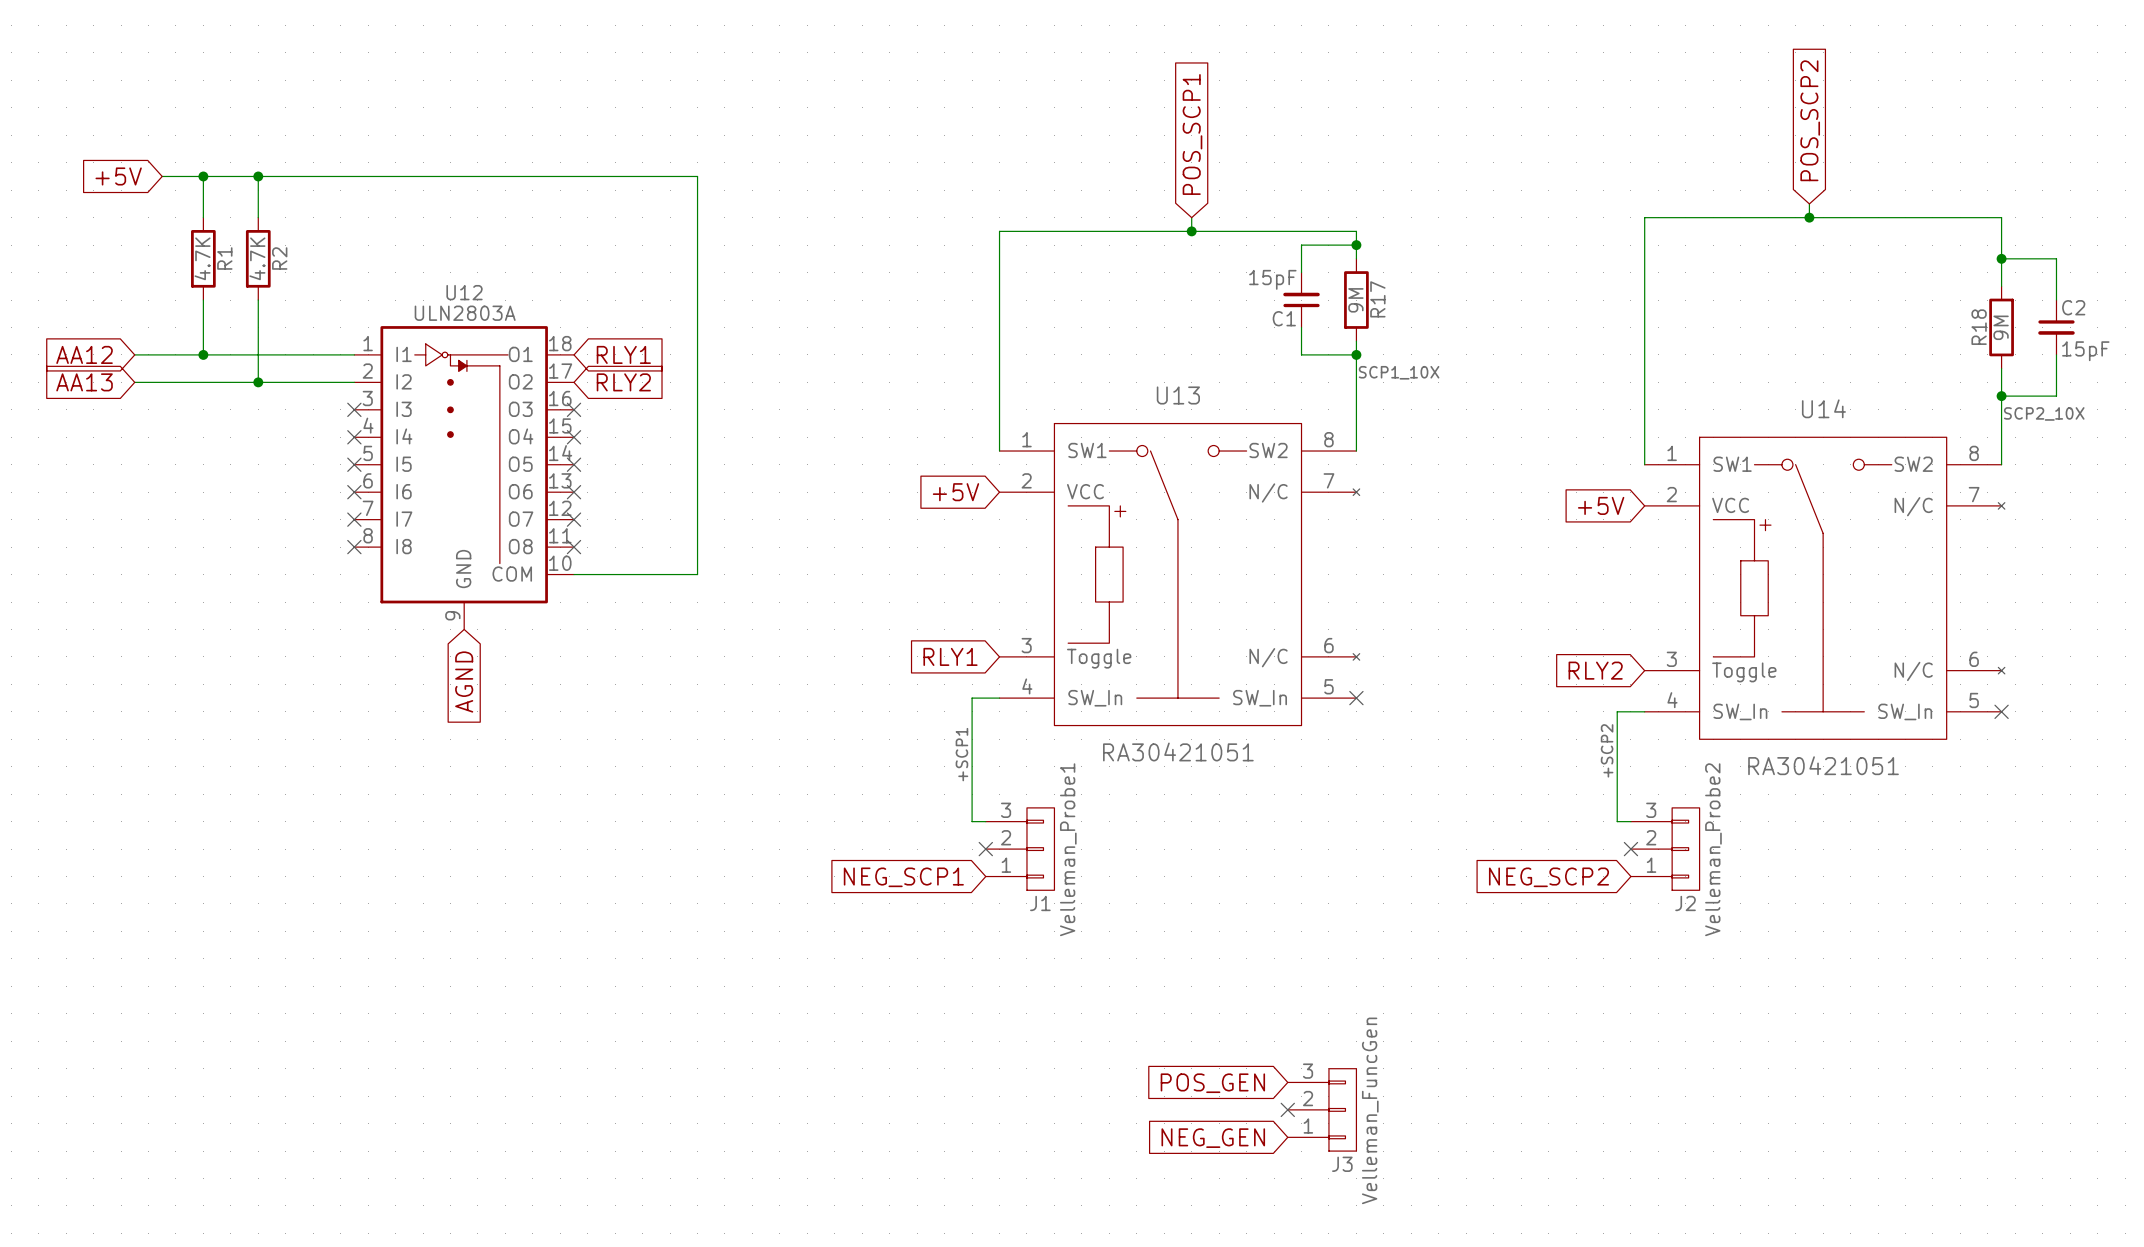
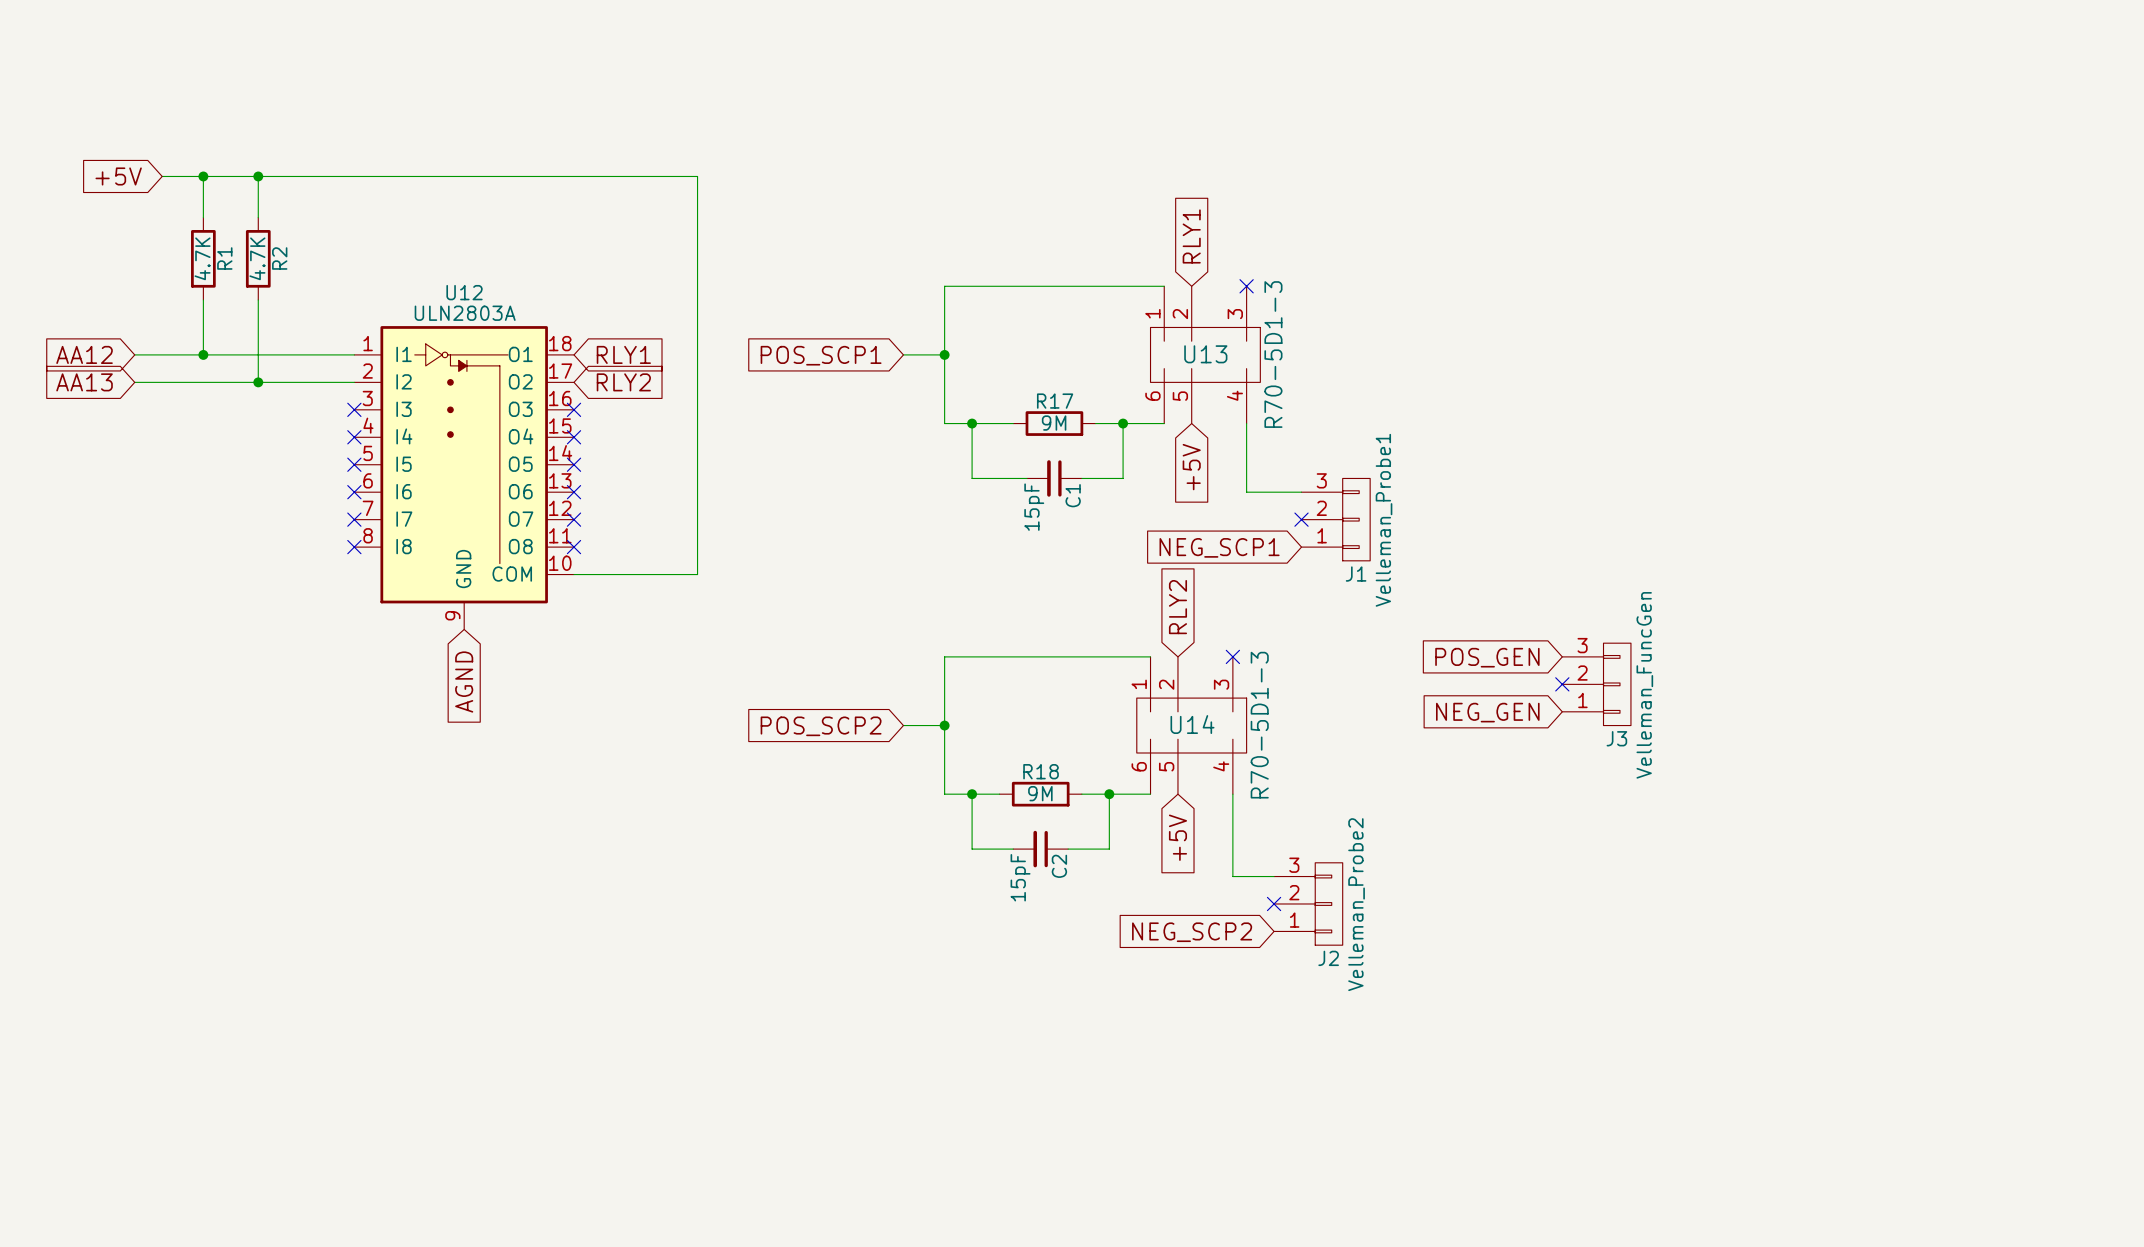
global label: POS_SCP2 (1810, 120) -> none
global label: POS_SCP1 (1192, 134) -> none
wire: (1809, 203) (1809, 217) -> none
wire: (1191, 217) (1191, 231) -> none
junction: (1809, 217) -> none
junction: (1191, 231) -> none
global label: none -> RLY1 (1191, 236)
wire: (1356, 245) (1301, 245) (1301, 272) -> none
junction: (1356, 245) -> none
wire: (1356, 258) (1356, 231) (999, 231) (999, 451) -> none
wire: (2001, 258) (2056, 258) (2056, 300) -> none
junction: (2001, 258) -> none
wire: none -> (1164, 286) (944, 286) (944, 423) (1013, 423)
no-connect mark: none -> (1246, 286)
wire: (2001, 286) (2001, 217) (1644, 217) (1644, 464) -> none
C1 rotation: 0° (1301, 299) -> 90° counterclockwise (1054, 478)
R17 name position: R17 (1377, 299) -> R17 (1055, 401)
C1 position: (1301, 300) -> (1054, 478)
R17 rotation: 0° (1356, 300) -> 90° clockwise (1054, 423)
R17 position: (1356, 300) -> (1054, 423)
wire: (1301, 327) (1301, 354) (1356, 354) -> none
R18 rotation: 0° (2001, 327) -> 90° clockwise (1040, 794)
R18 position: (2001, 327) -> (1040, 794)
C2 rotation: 0° (2056, 327) -> 90° clockwise (1040, 849)
C2 position: (2056, 327) -> (1040, 849)
wire: (1356, 341) (1356, 451) -> none
wire: none -> (903, 354) (944, 354)
junction: none -> (944, 354)
junction: (1356, 354) -> none
wire: (2056, 354) (2056, 396) (2001, 396) -> none
global label: none -> POS_SCP1 (821, 355)
wire: (2001, 368) (2001, 464) -> none
label: SCP1_10X (1399, 372) -> none
U13 name position: U13 (1178, 395) -> U13 (1205, 354)
junction: (2001, 396) -> none
U14 name position: U14 (1823, 408) -> U14 (1192, 724)
label: SCP2_10X (2044, 413) -> none
wire: none -> (972, 423) (972, 478) (1026, 478)
junction: none -> (972, 423)
U13 symbol: [999, 423, 1360, 726] -> [1150, 286, 1261, 424]
wire: none -> (1123, 423) (1123, 478) (1081, 478)
junction: none -> (1123, 423)
wire: none -> (1246, 423) (1246, 492) (1301, 492)
U14 symbol: [1644, 437, 2005, 740] -> [1136, 656, 1247, 795]
global label: none -> +5V (1191, 467)
global label: +5V (955, 492) -> none
global label: +5V (1601, 505) -> none
no-connect mark: none -> (1301, 519)
global label: none -> NEG_SCP1 (1219, 547)
global label: none -> RLY2 (1177, 607)
global label: RLY1 (950, 656) -> none
wire: none -> (1150, 656) (944, 656) (944, 794) (999, 794)
no-connect mark: none -> (1232, 656)
global label: none -> POS_GEN (1487, 657)
global label: RLY2 (1595, 670) -> none
no-connect mark: none -> (1562, 684)
wire: (999, 698) (972, 698) (972, 794) -> none
no-connect mark: (1356, 698) -> none
wire: (1644, 711) (1617, 711) (1617, 821) (1630, 821) -> none
no-connect mark: (2001, 711) -> none
global label: none -> NEG_GEN (1487, 712)
wire: none -> (903, 725) (944, 725)
junction: none -> (944, 725)
global label: none -> POS_SCP2 (821, 726)
label: +SCP2 (1607, 750) -> none
U13 value: RA30421051 (1178, 751) -> R70-5D1-3 (1273, 354)
label: +SCP1 (961, 754) -> none
U14 value: RA30421051 (1823, 765) -> R70-5D1-3 (1259, 725)
junction: none -> (972, 794)
wire: none -> (1081, 794) (1150, 794)
wire: none -> (1109, 794) (1109, 849) (1068, 849)
junction: none -> (1109, 794)
wire: none -> (1232, 794) (1232, 876) (1274, 876)
wire: (972, 821) (985, 821) -> (972, 821) (972, 849) (1013, 849)
global label: none -> +5V (1177, 837)
no-connect mark: (985, 849) -> none
J1 position: (1020, 849) -> (1335, 519)
no-connect mark: (1630, 849) -> none
J2 position: (1665, 849) -> (1308, 903)
global label: NEG_SCP1 (903, 877) -> none
global label: NEG_SCP2 (1548, 877) -> none
no-connect mark: none -> (1274, 903)
global label: none -> NEG_SCP2 (1192, 932)
global label: POS_GEN (1212, 1083) -> none
no-connect mark: (1287, 1109) -> none
J3 position: (1322, 1109) -> (1596, 684)
global label: NEG_GEN (1213, 1138) -> none

